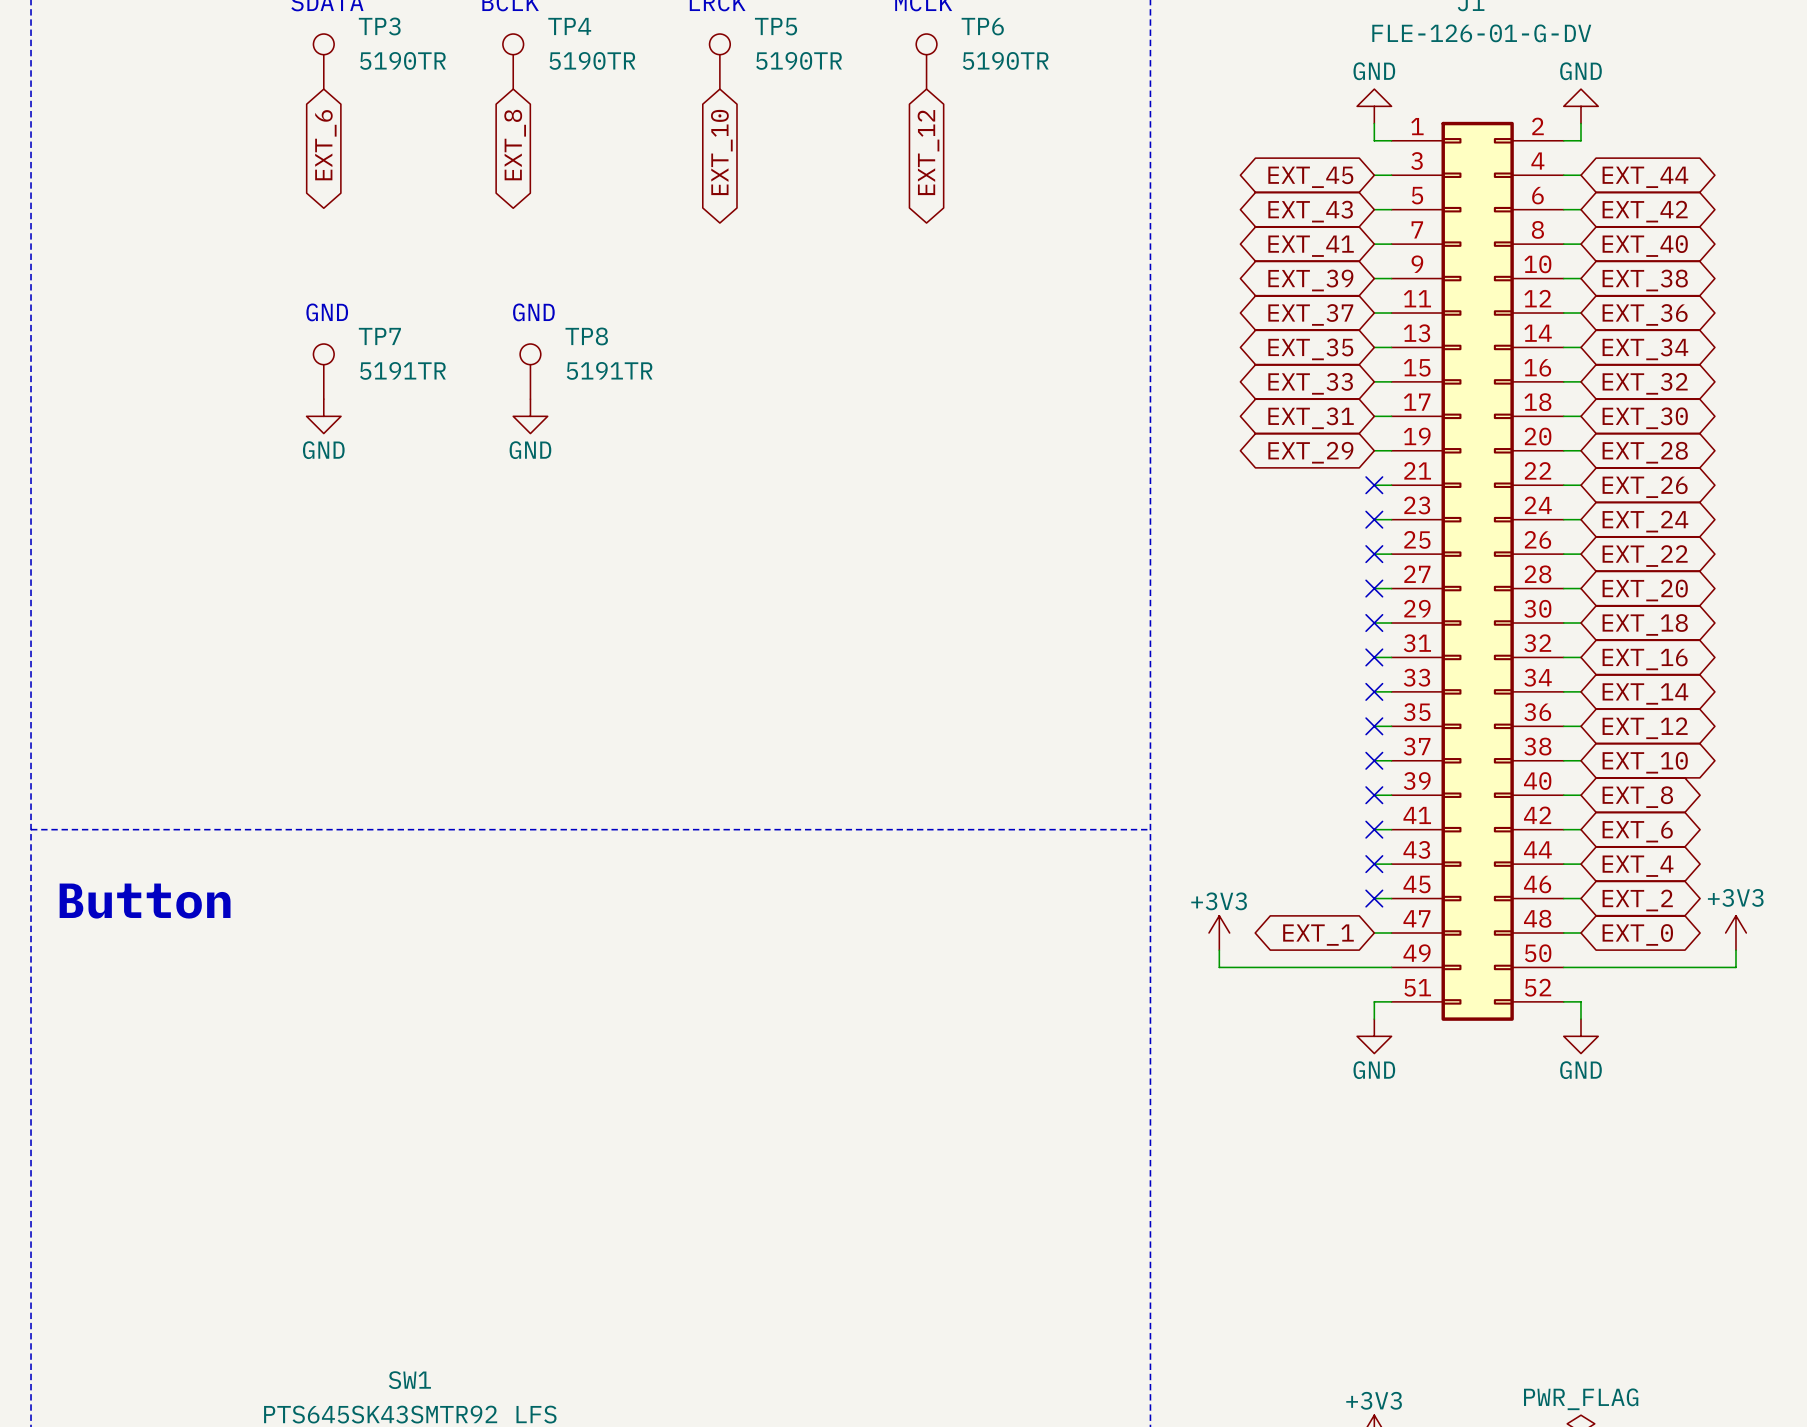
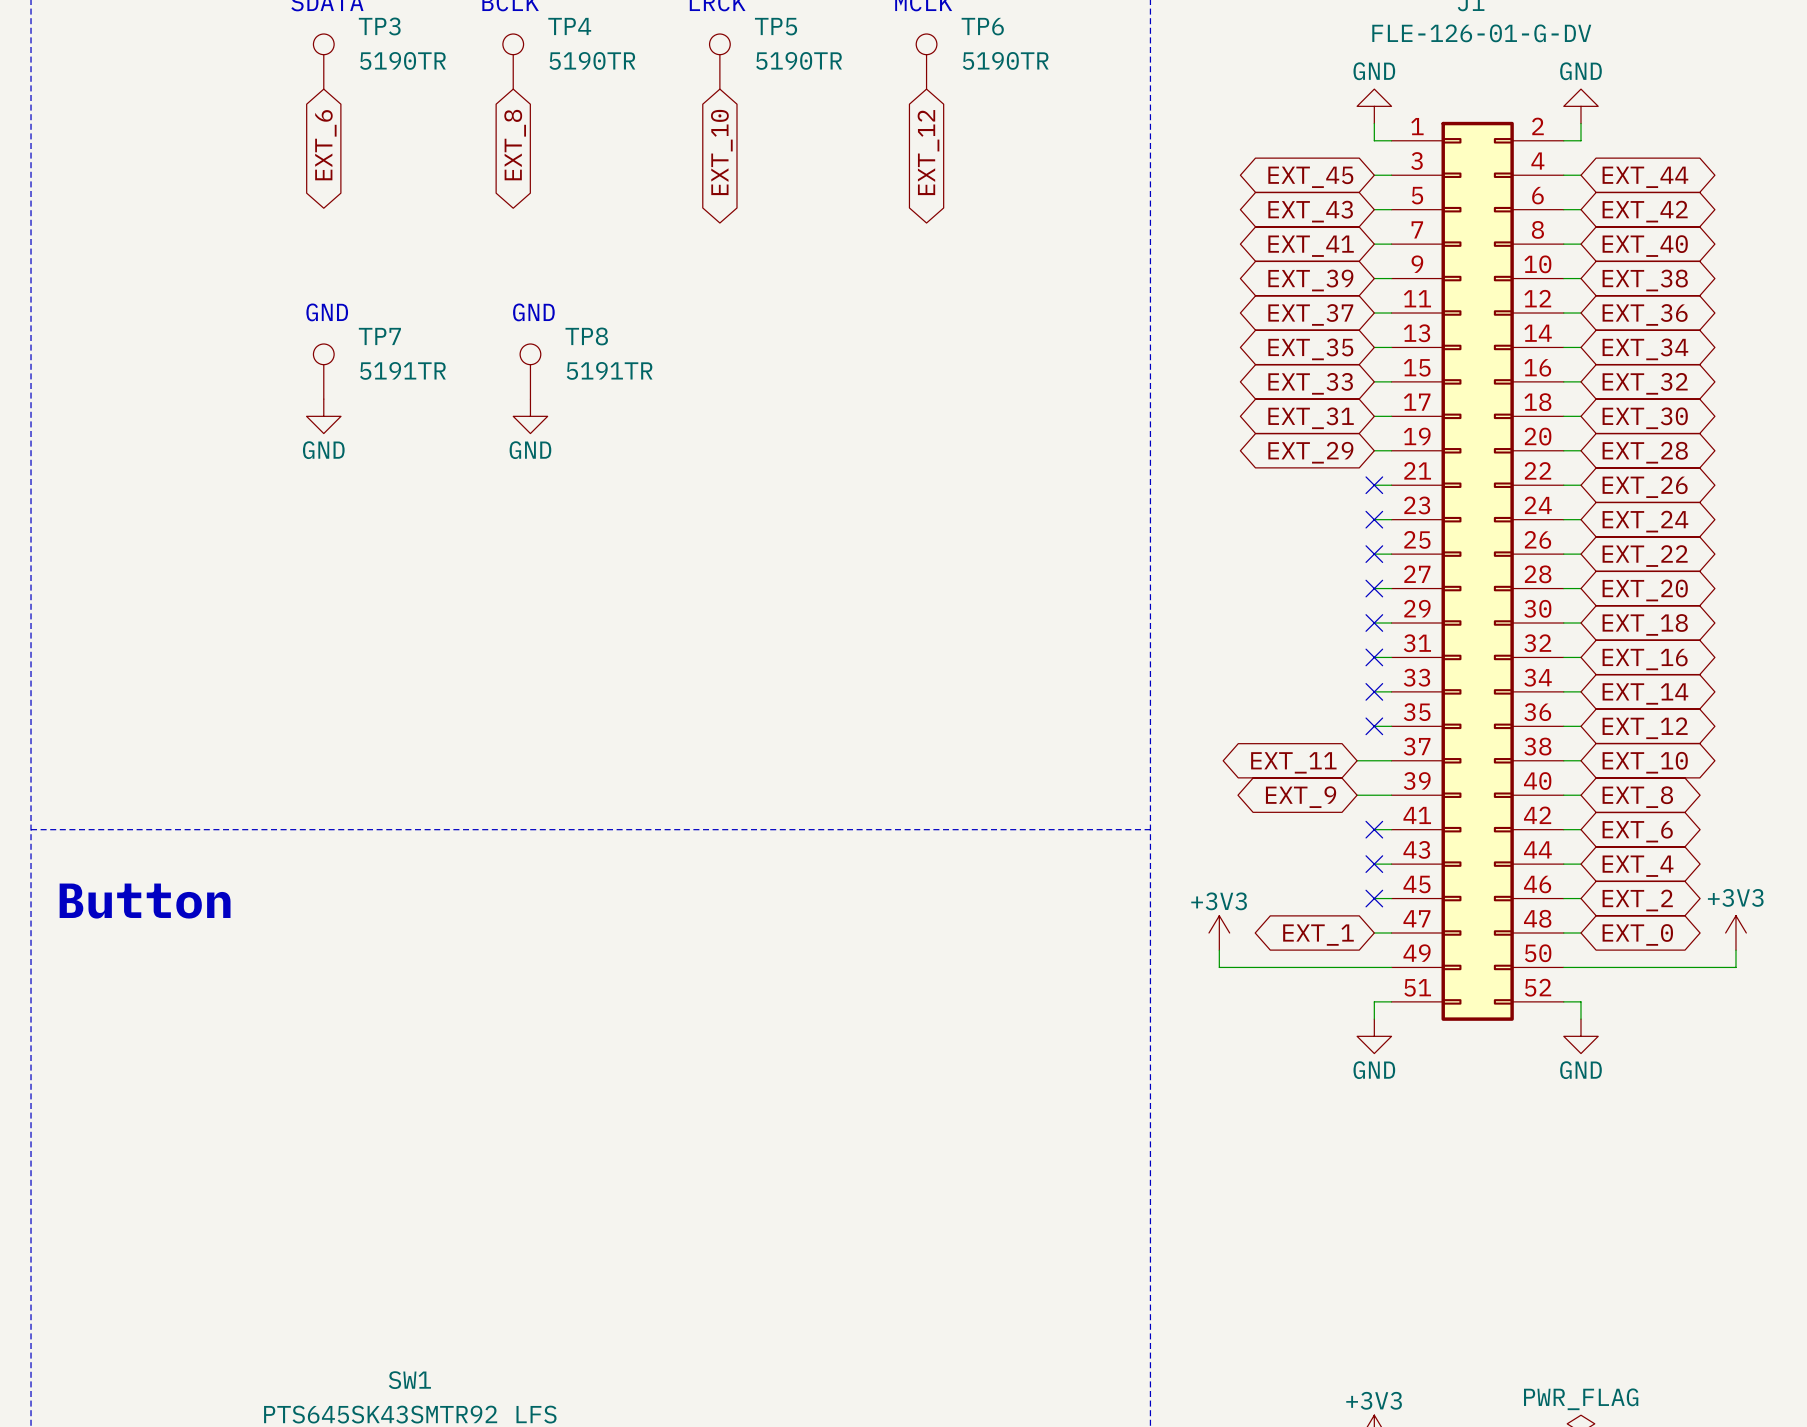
wire: none -> (1357, 760) (1374, 760)
no-connect mark: (1374, 760) -> none
global label: none -> EXT_11 (1293, 762)
wire: none -> (1357, 795) (1374, 795)
no-connect mark: (1374, 795) -> none
global label: none -> EXT_9 (1301, 797)

